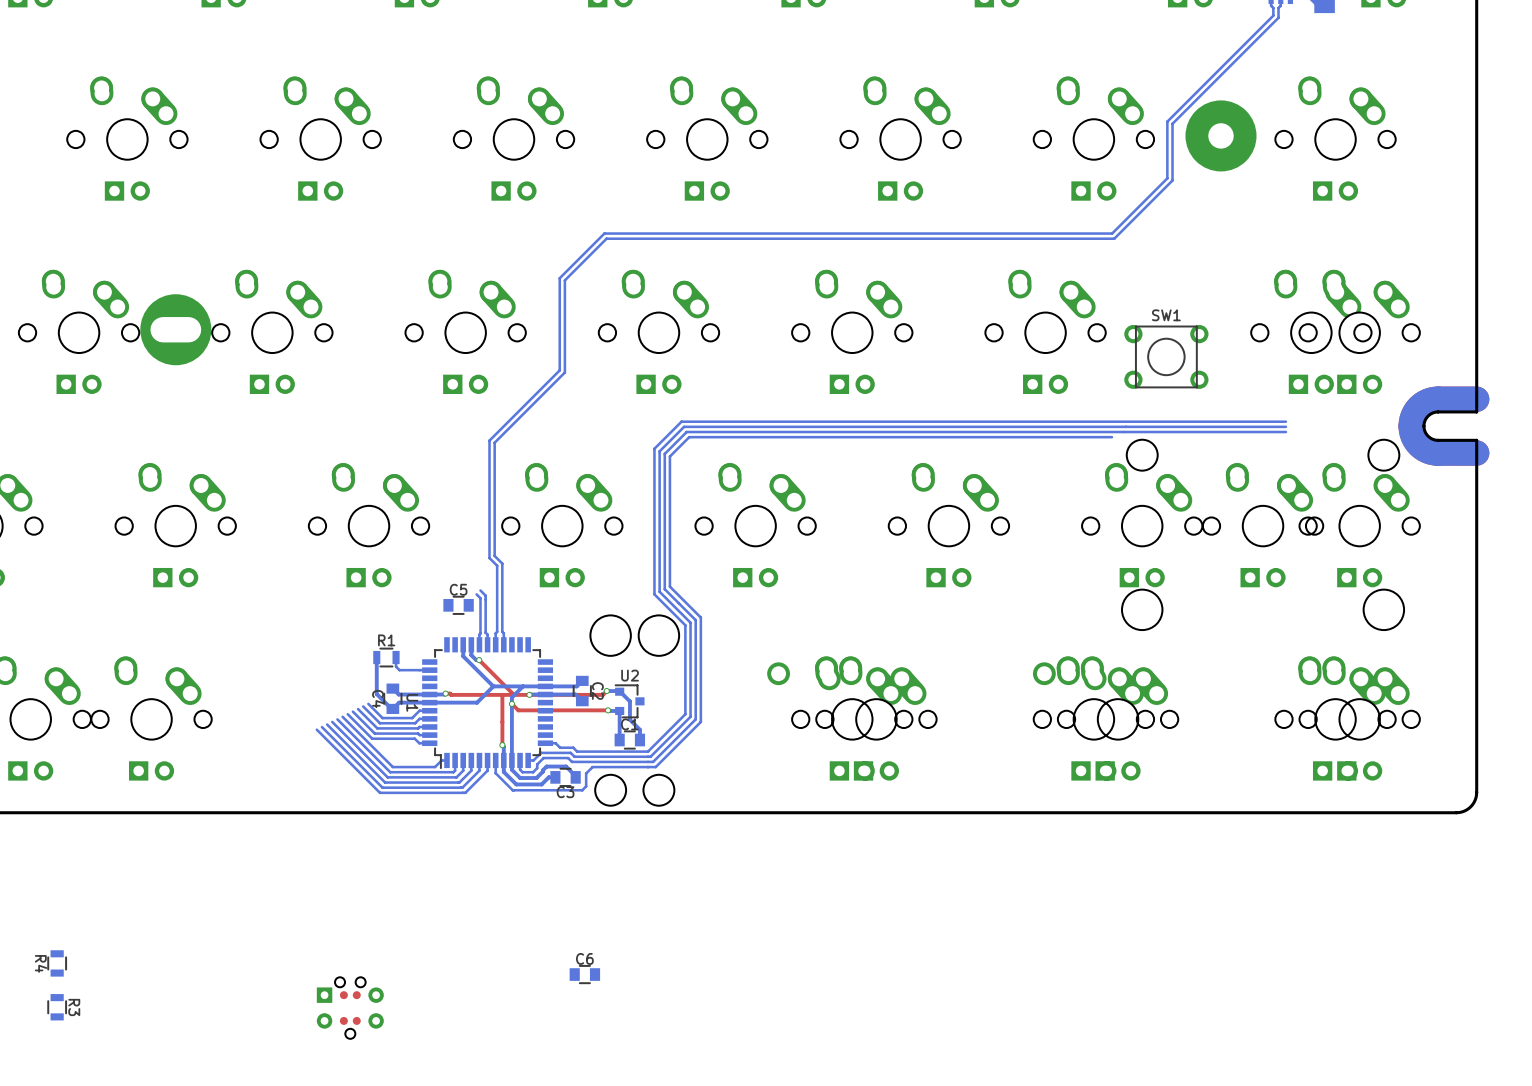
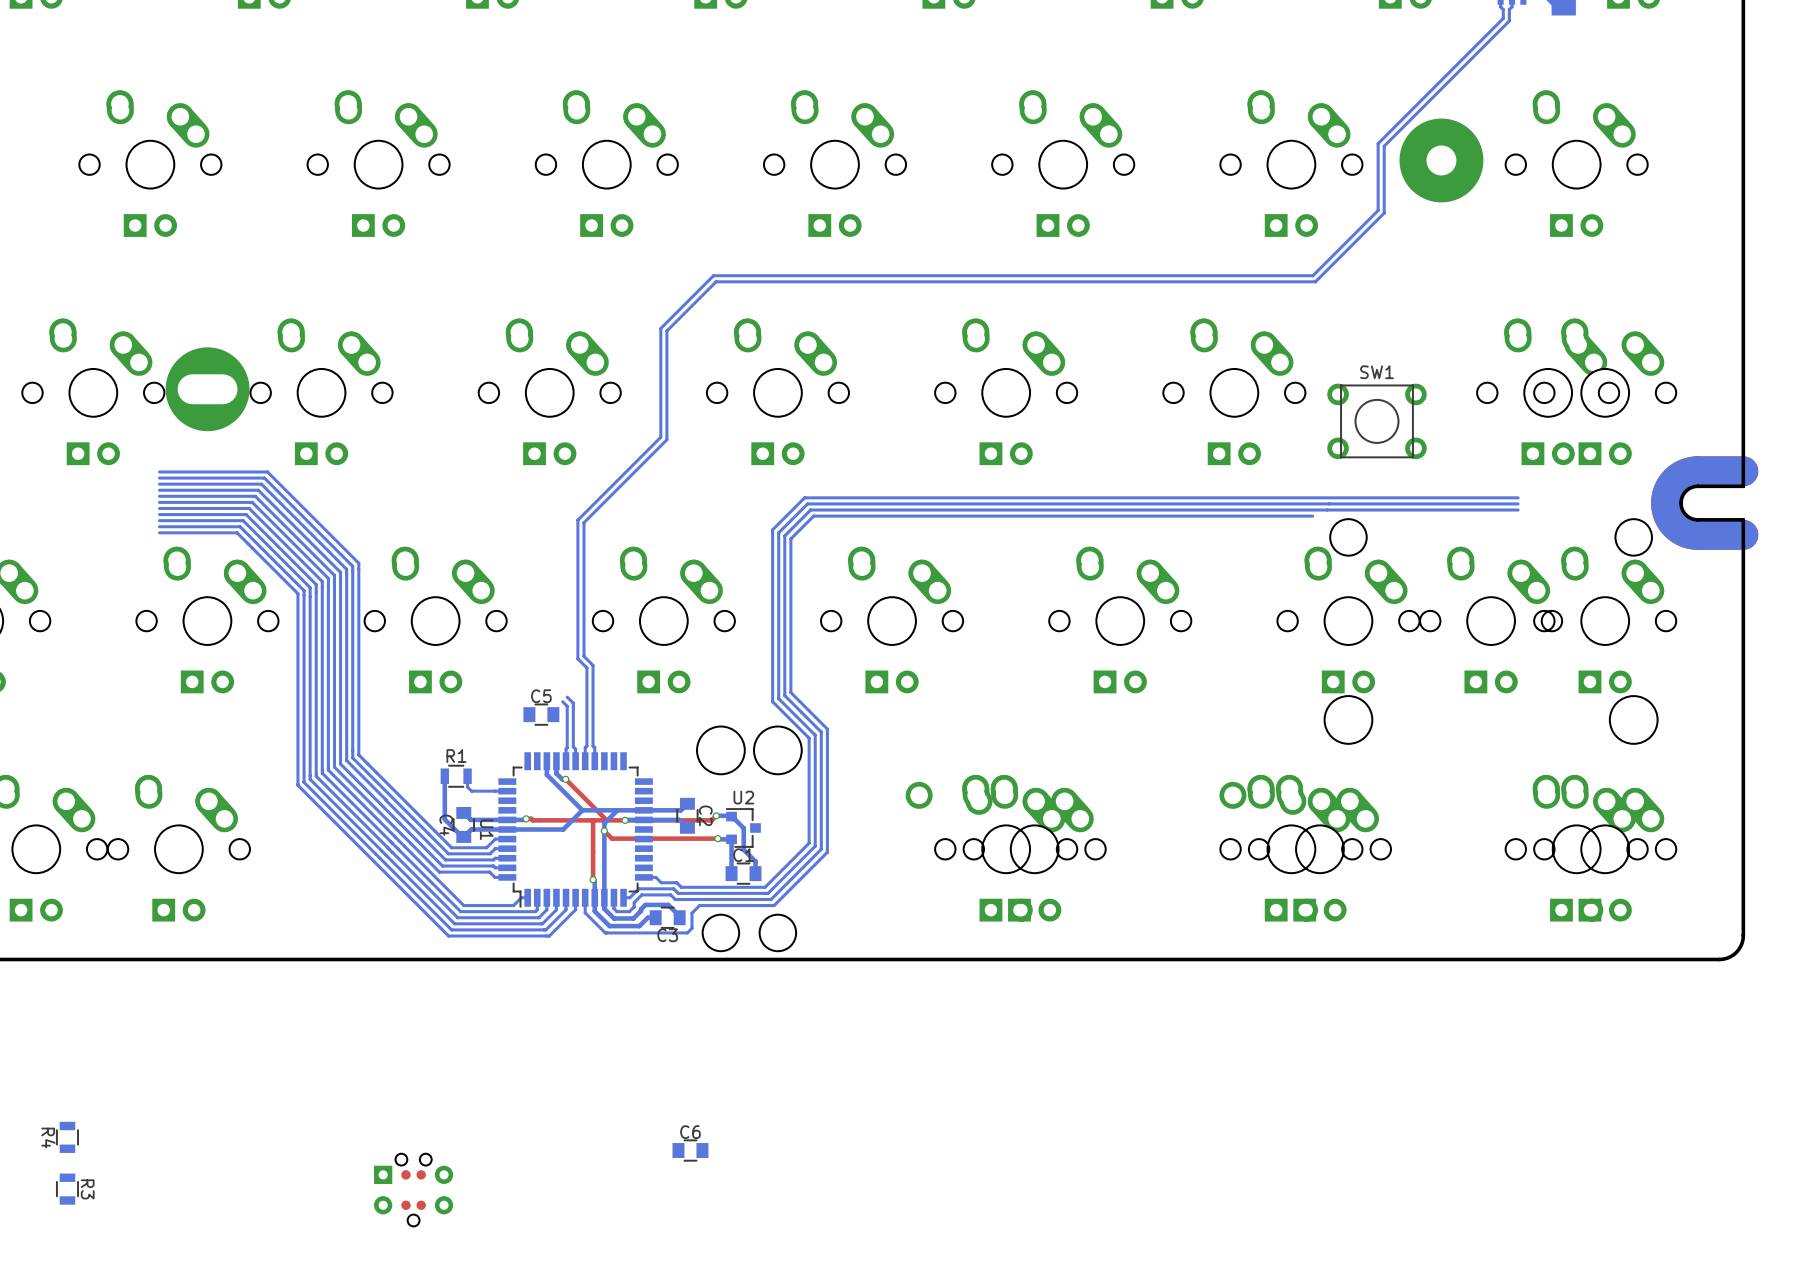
bottom track: none -> (159, 471) (267, 471) (358, 563) (358, 754) (434, 831)
bottom track: none -> (159, 478) (264, 478) (352, 566) (352, 757) (428, 834)
bottom track: none -> (159, 484) (261, 484) (346, 569) (346, 760) (422, 837)
bottom track: none -> (159, 490) (258, 490) (340, 572) (340, 764) (416, 840)
bottom track: none -> (159, 496) (255, 496) (334, 575) (334, 767) (410, 843)
bottom track: none -> (159, 502) (252, 502) (328, 578) (328, 770) (404, 846)
bottom track: none -> (159, 508) (249, 508) (322, 581) (322, 773) (398, 849)
bottom track: none -> (159, 514) (246, 514) (316, 584) (316, 776) (392, 852)
bottom track: none -> (159, 520) (243, 520) (310, 587) (310, 779) (386, 855)
bottom track: none -> (159, 526) (240, 526) (304, 590) (304, 782) (380, 858)
bottom track: none -> (159, 532) (237, 532) (297, 593) (297, 785) (374, 861)

